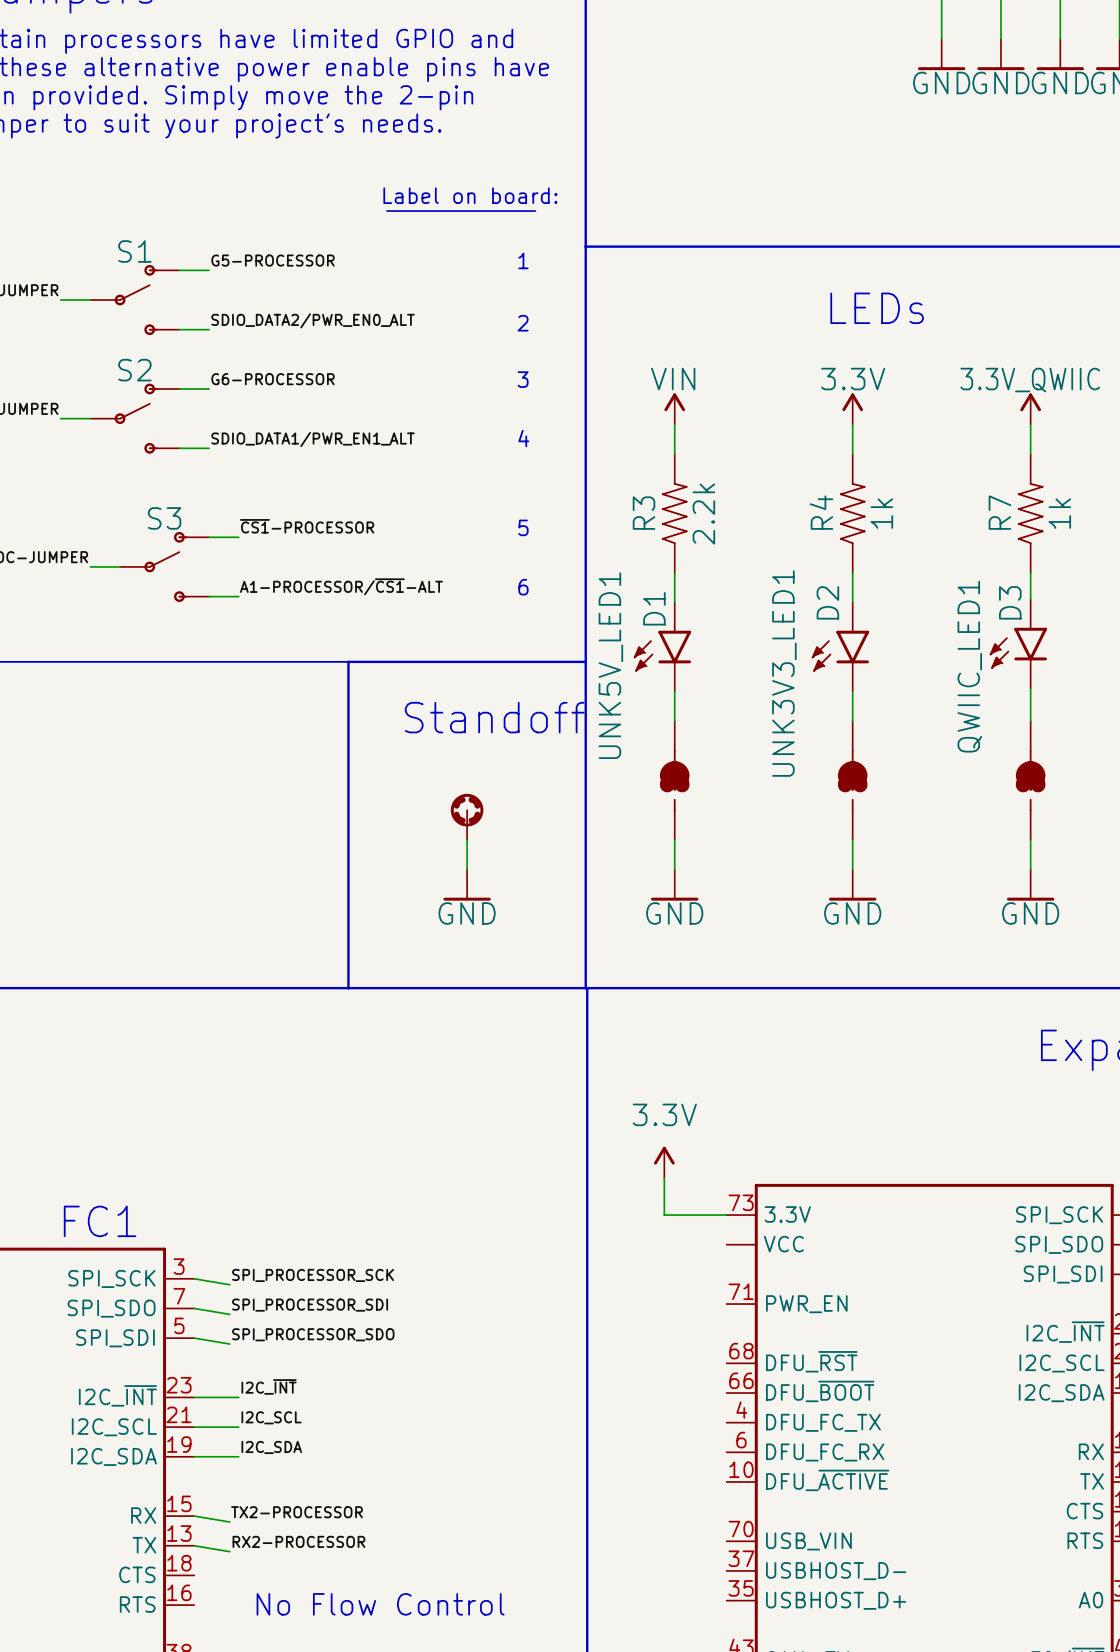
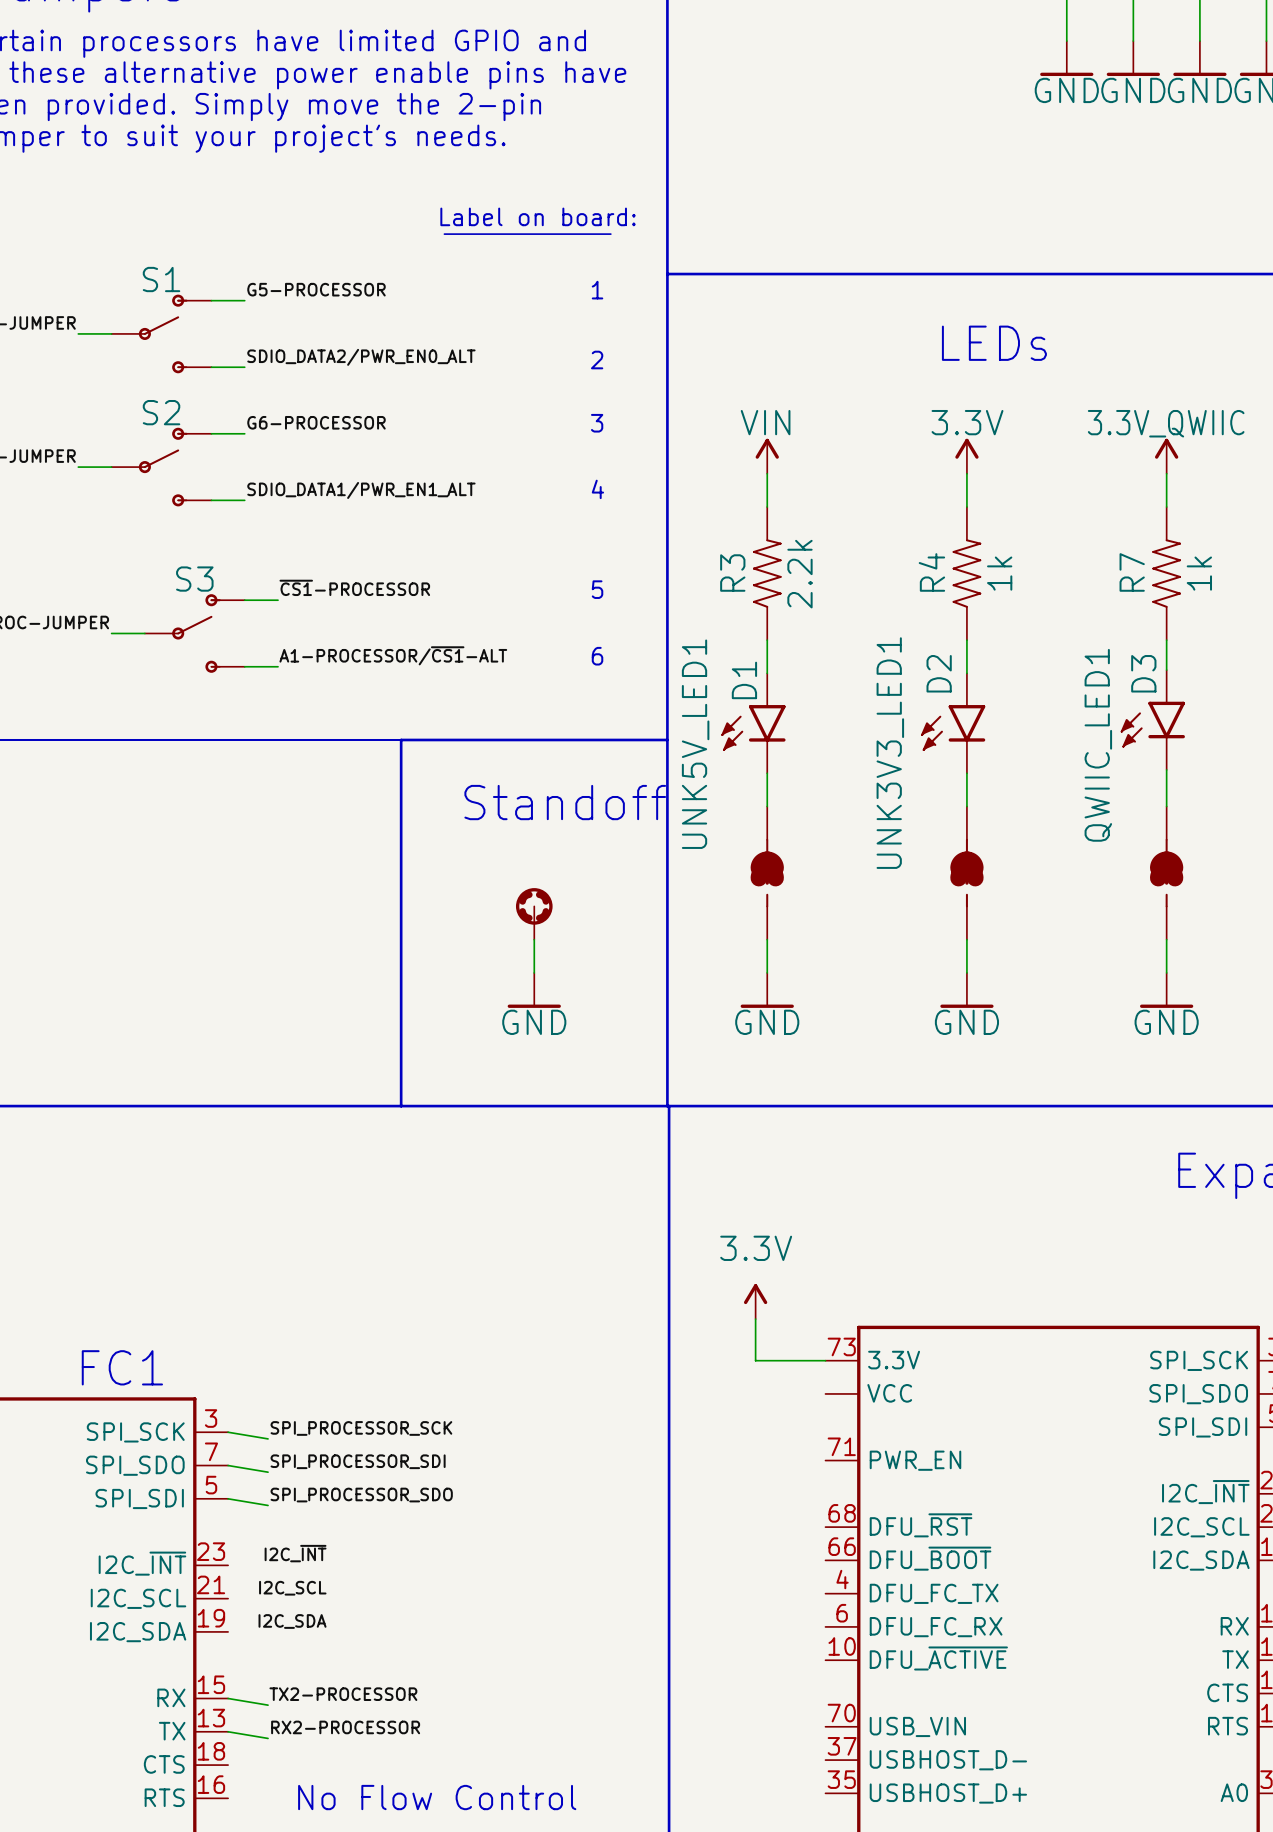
label position: I2C_~{INT} (269, 1386) -> I2C_~{INT} (295, 1553)
wire: (194, 1397) (238, 1397) -> none
label position: I2C_SCL (271, 1417) -> I2C_SCL (292, 1588)
wire: (194, 1427) (238, 1427) -> none
label position: I2C_SDA (271, 1447) -> I2C_SDA (292, 1621)
wire: (194, 1456) (238, 1456) -> none

